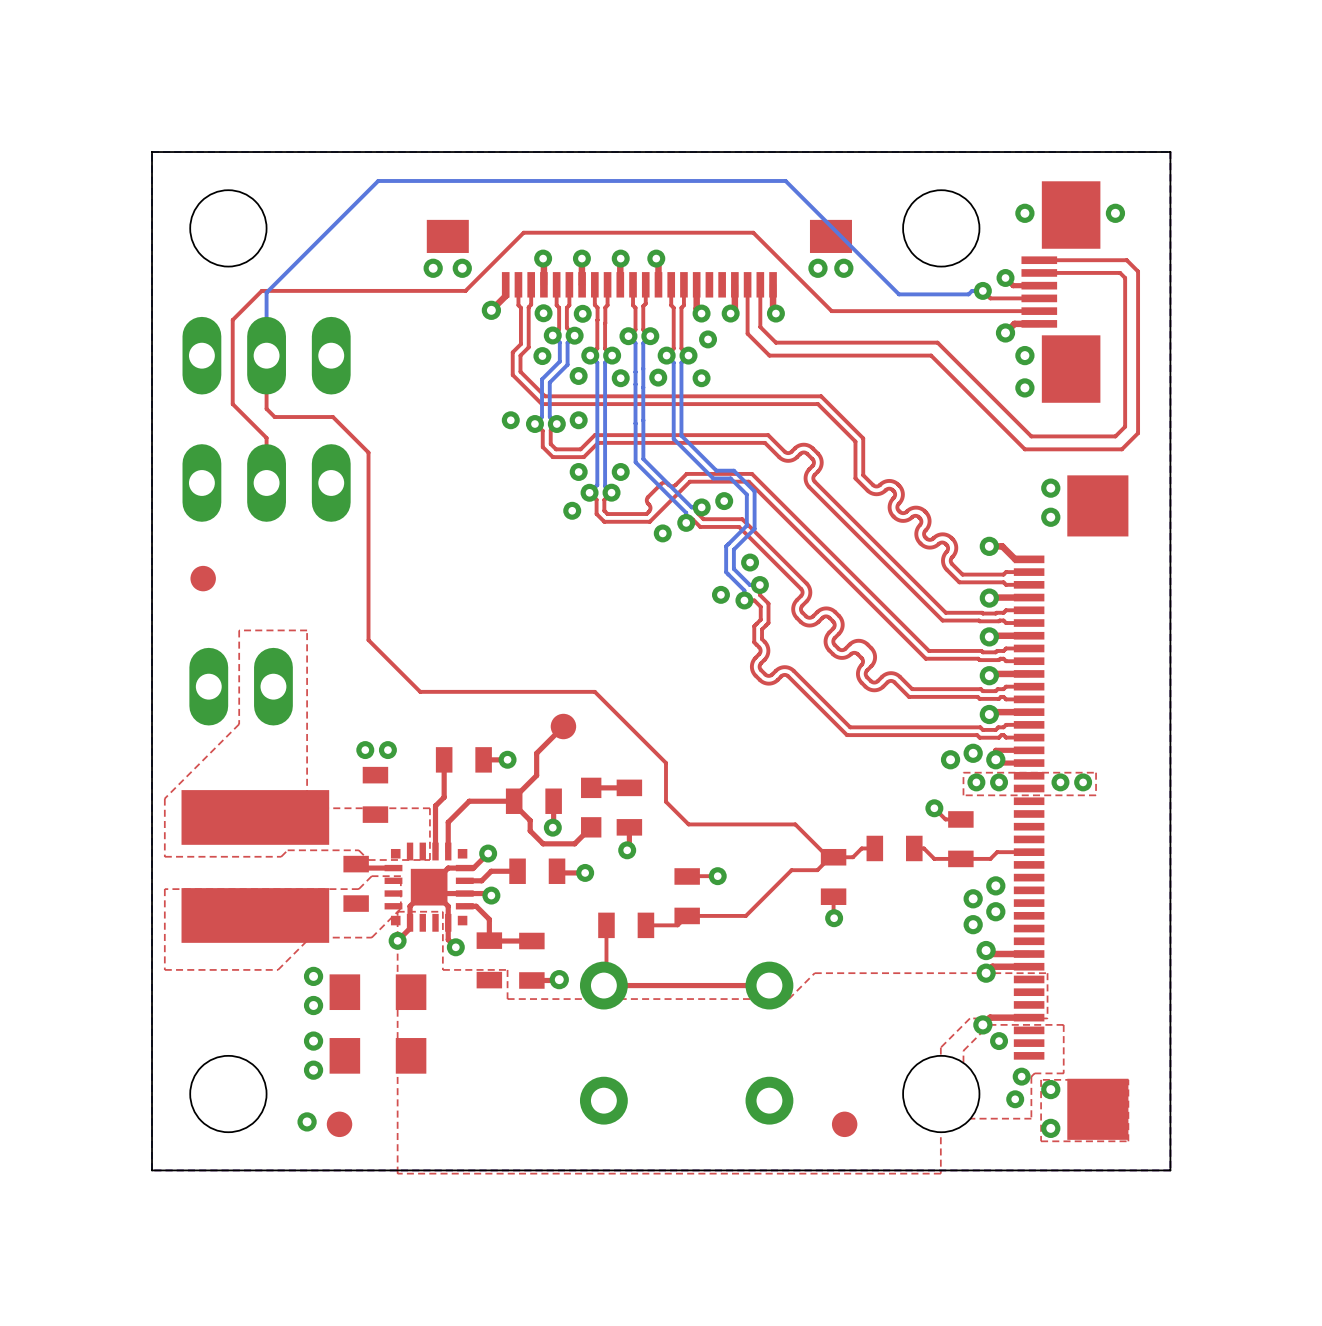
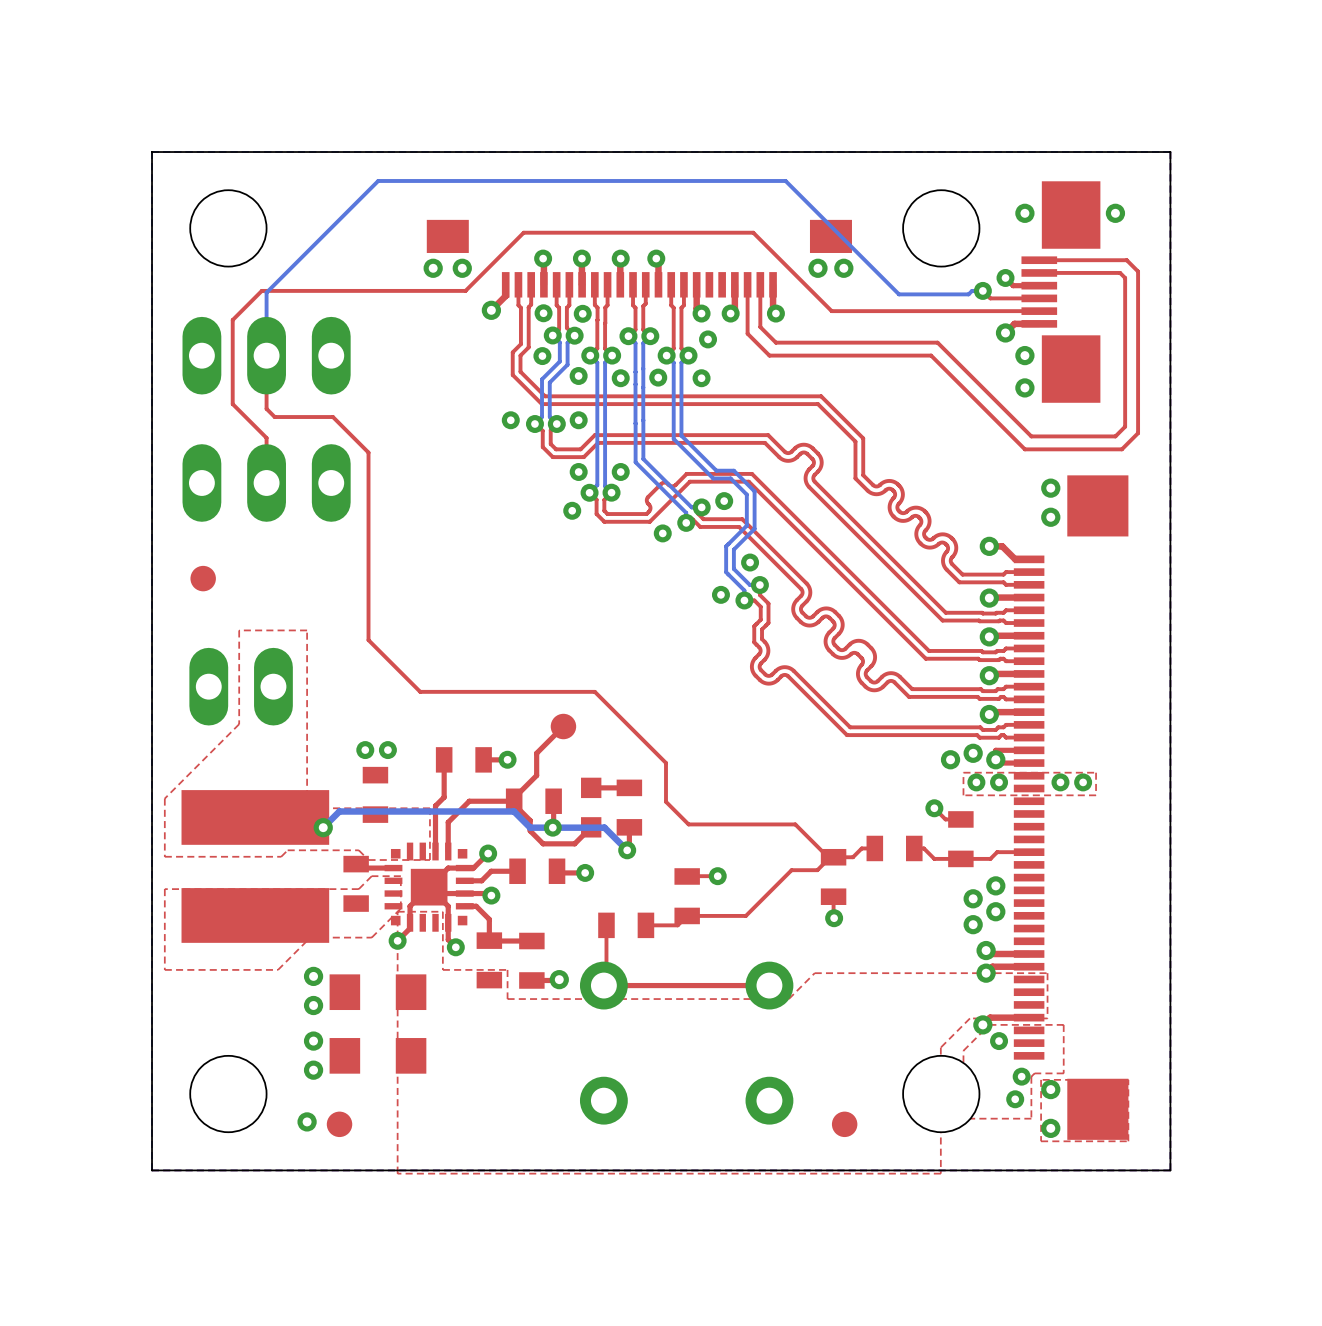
bottom track: none -> (323, 827) (339, 811) (514, 811) (530, 827) (604, 827) (627, 850)
via: none -> (323, 827)

